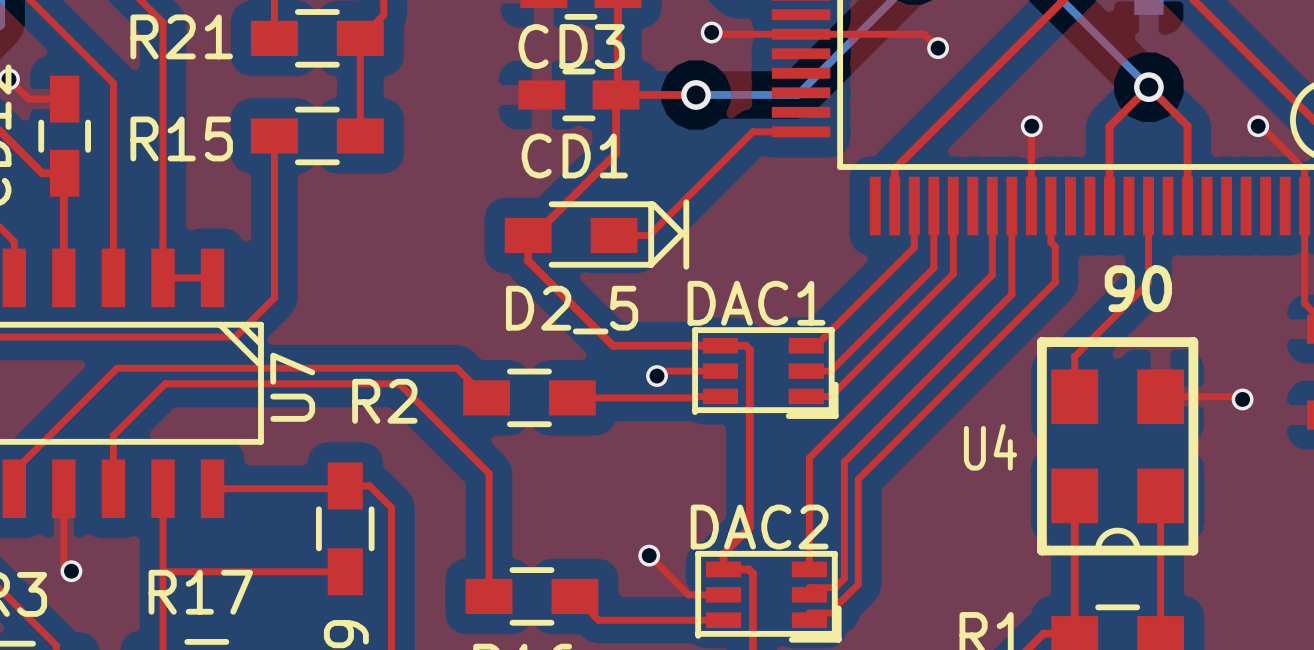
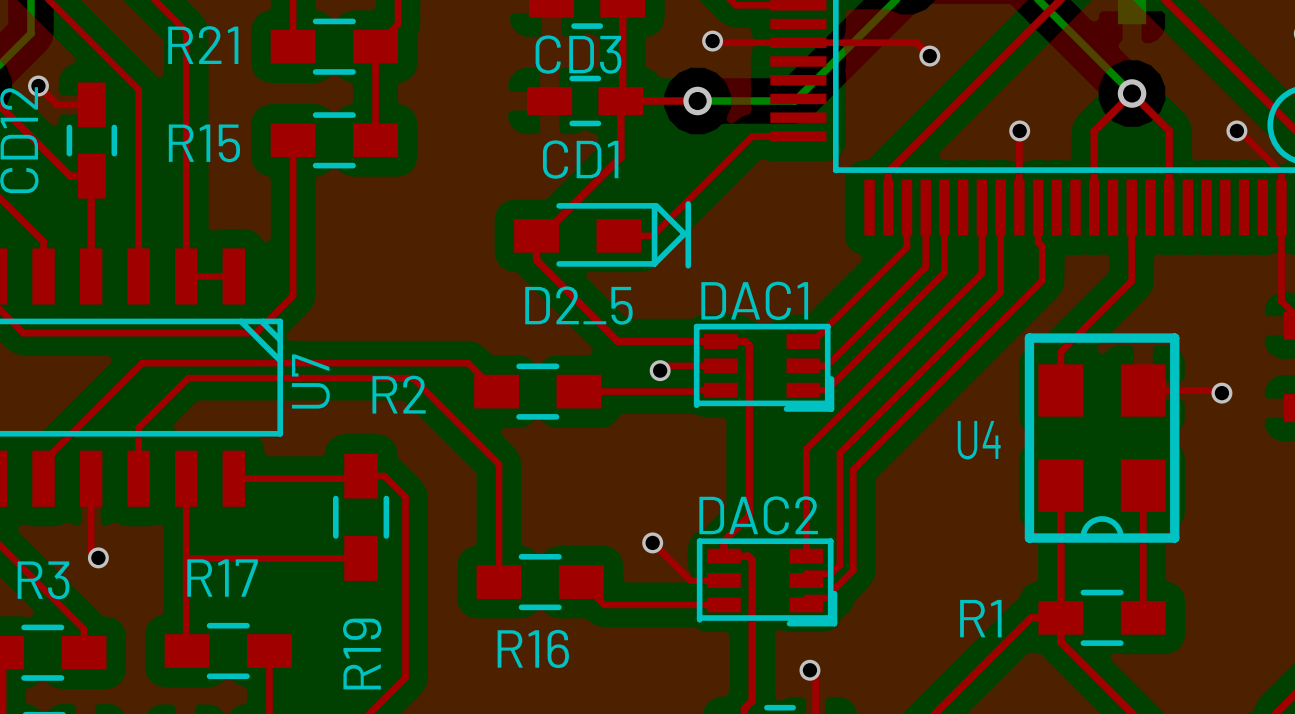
text: 90 (1138, 288) -> none

